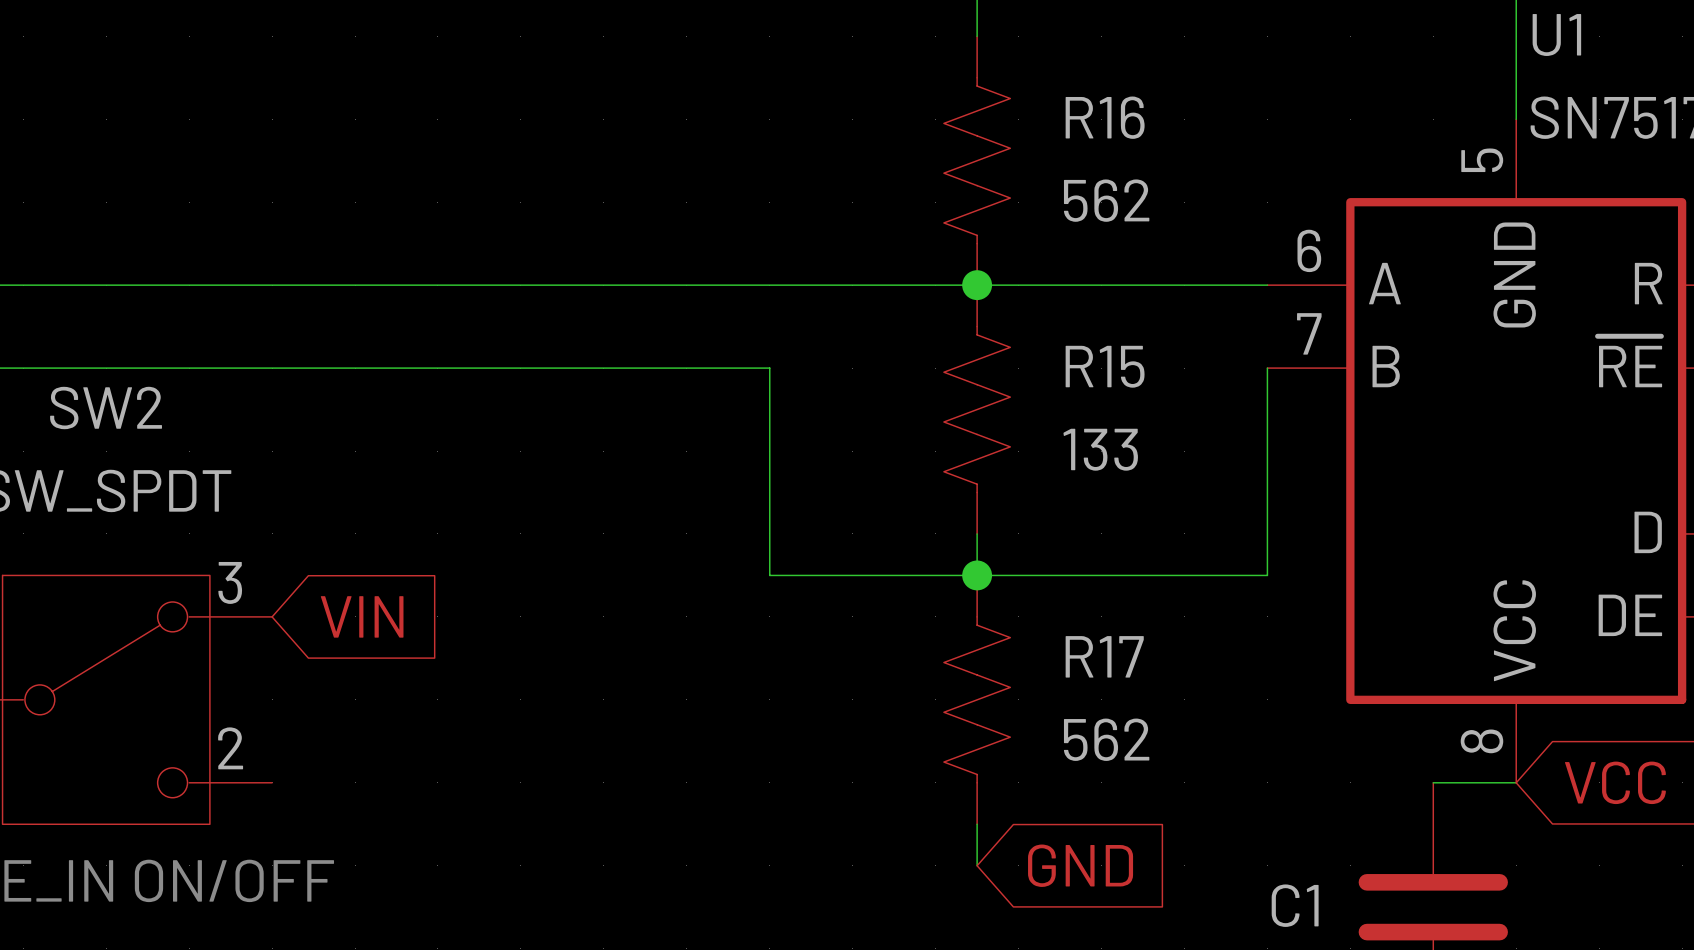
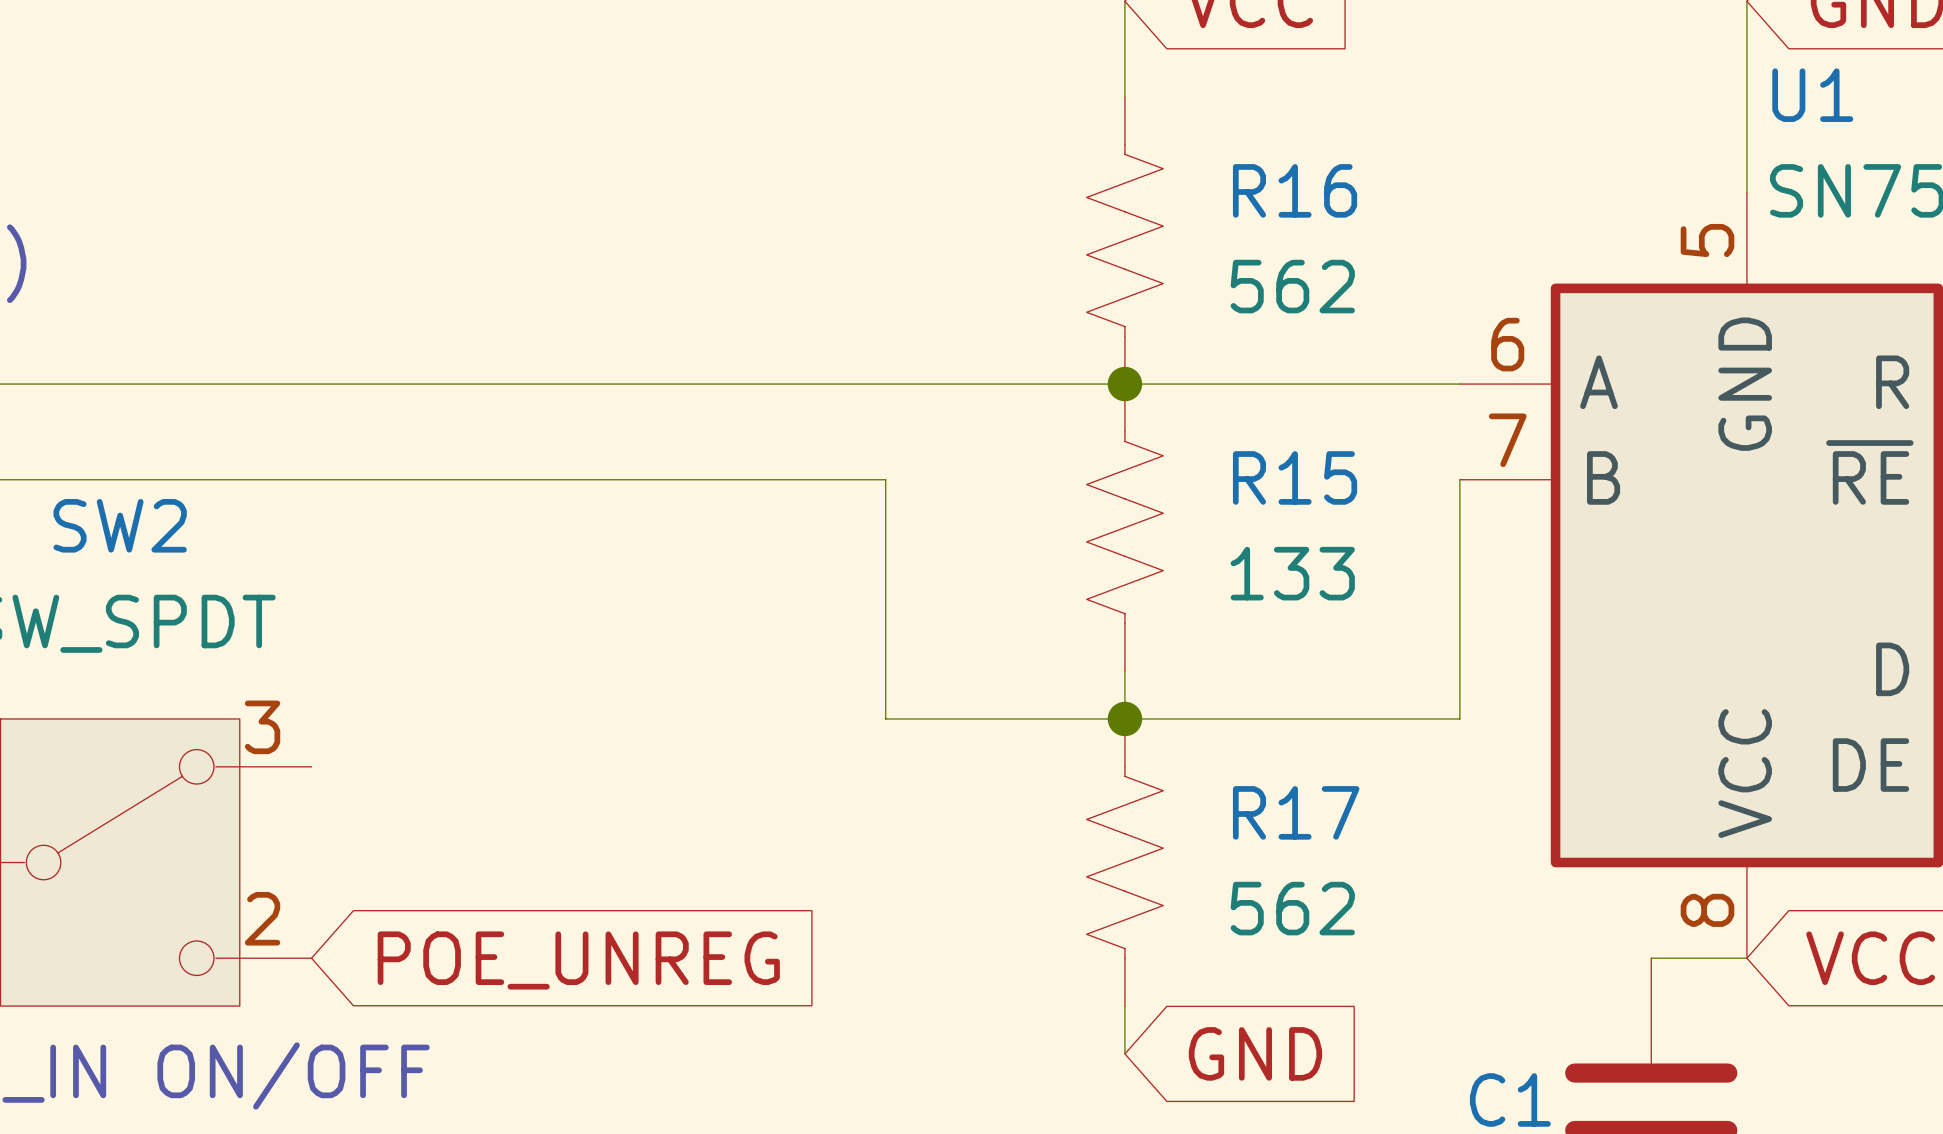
global label: VIN (362, 616) -> none
global label: none -> POE_UNREG (578, 960)

